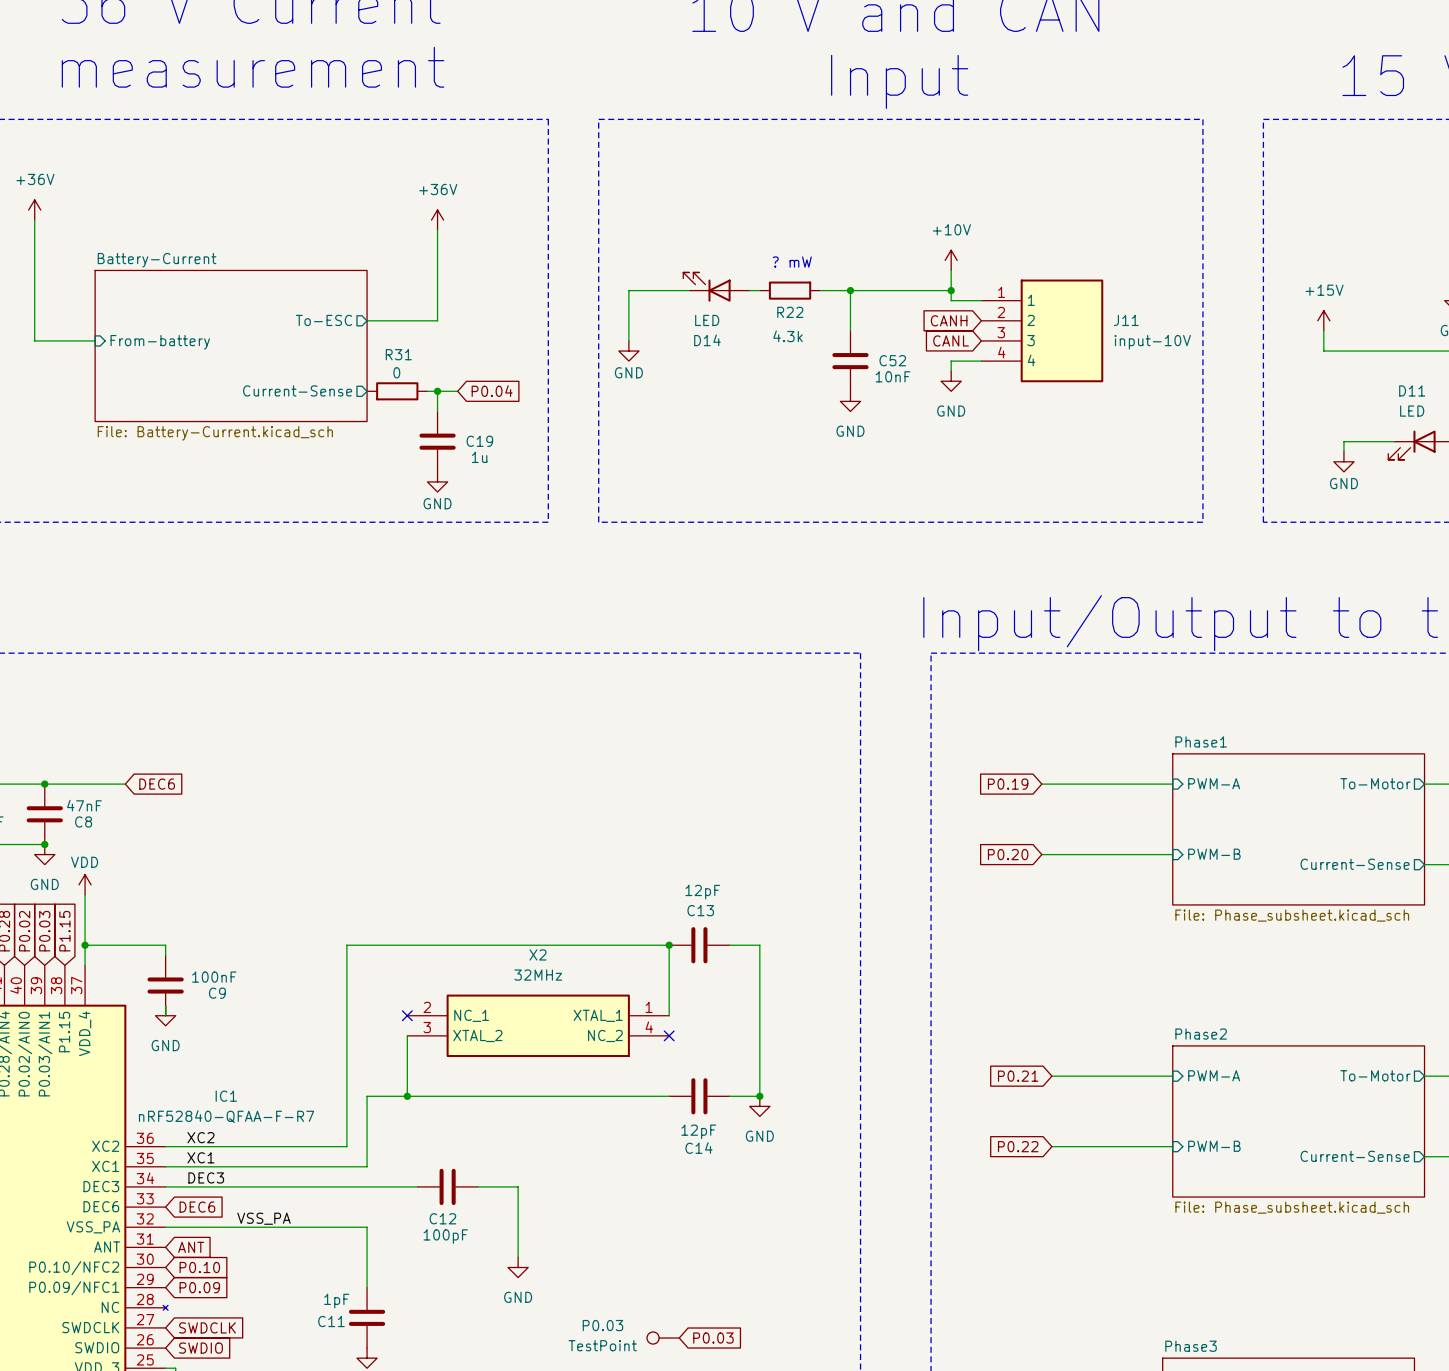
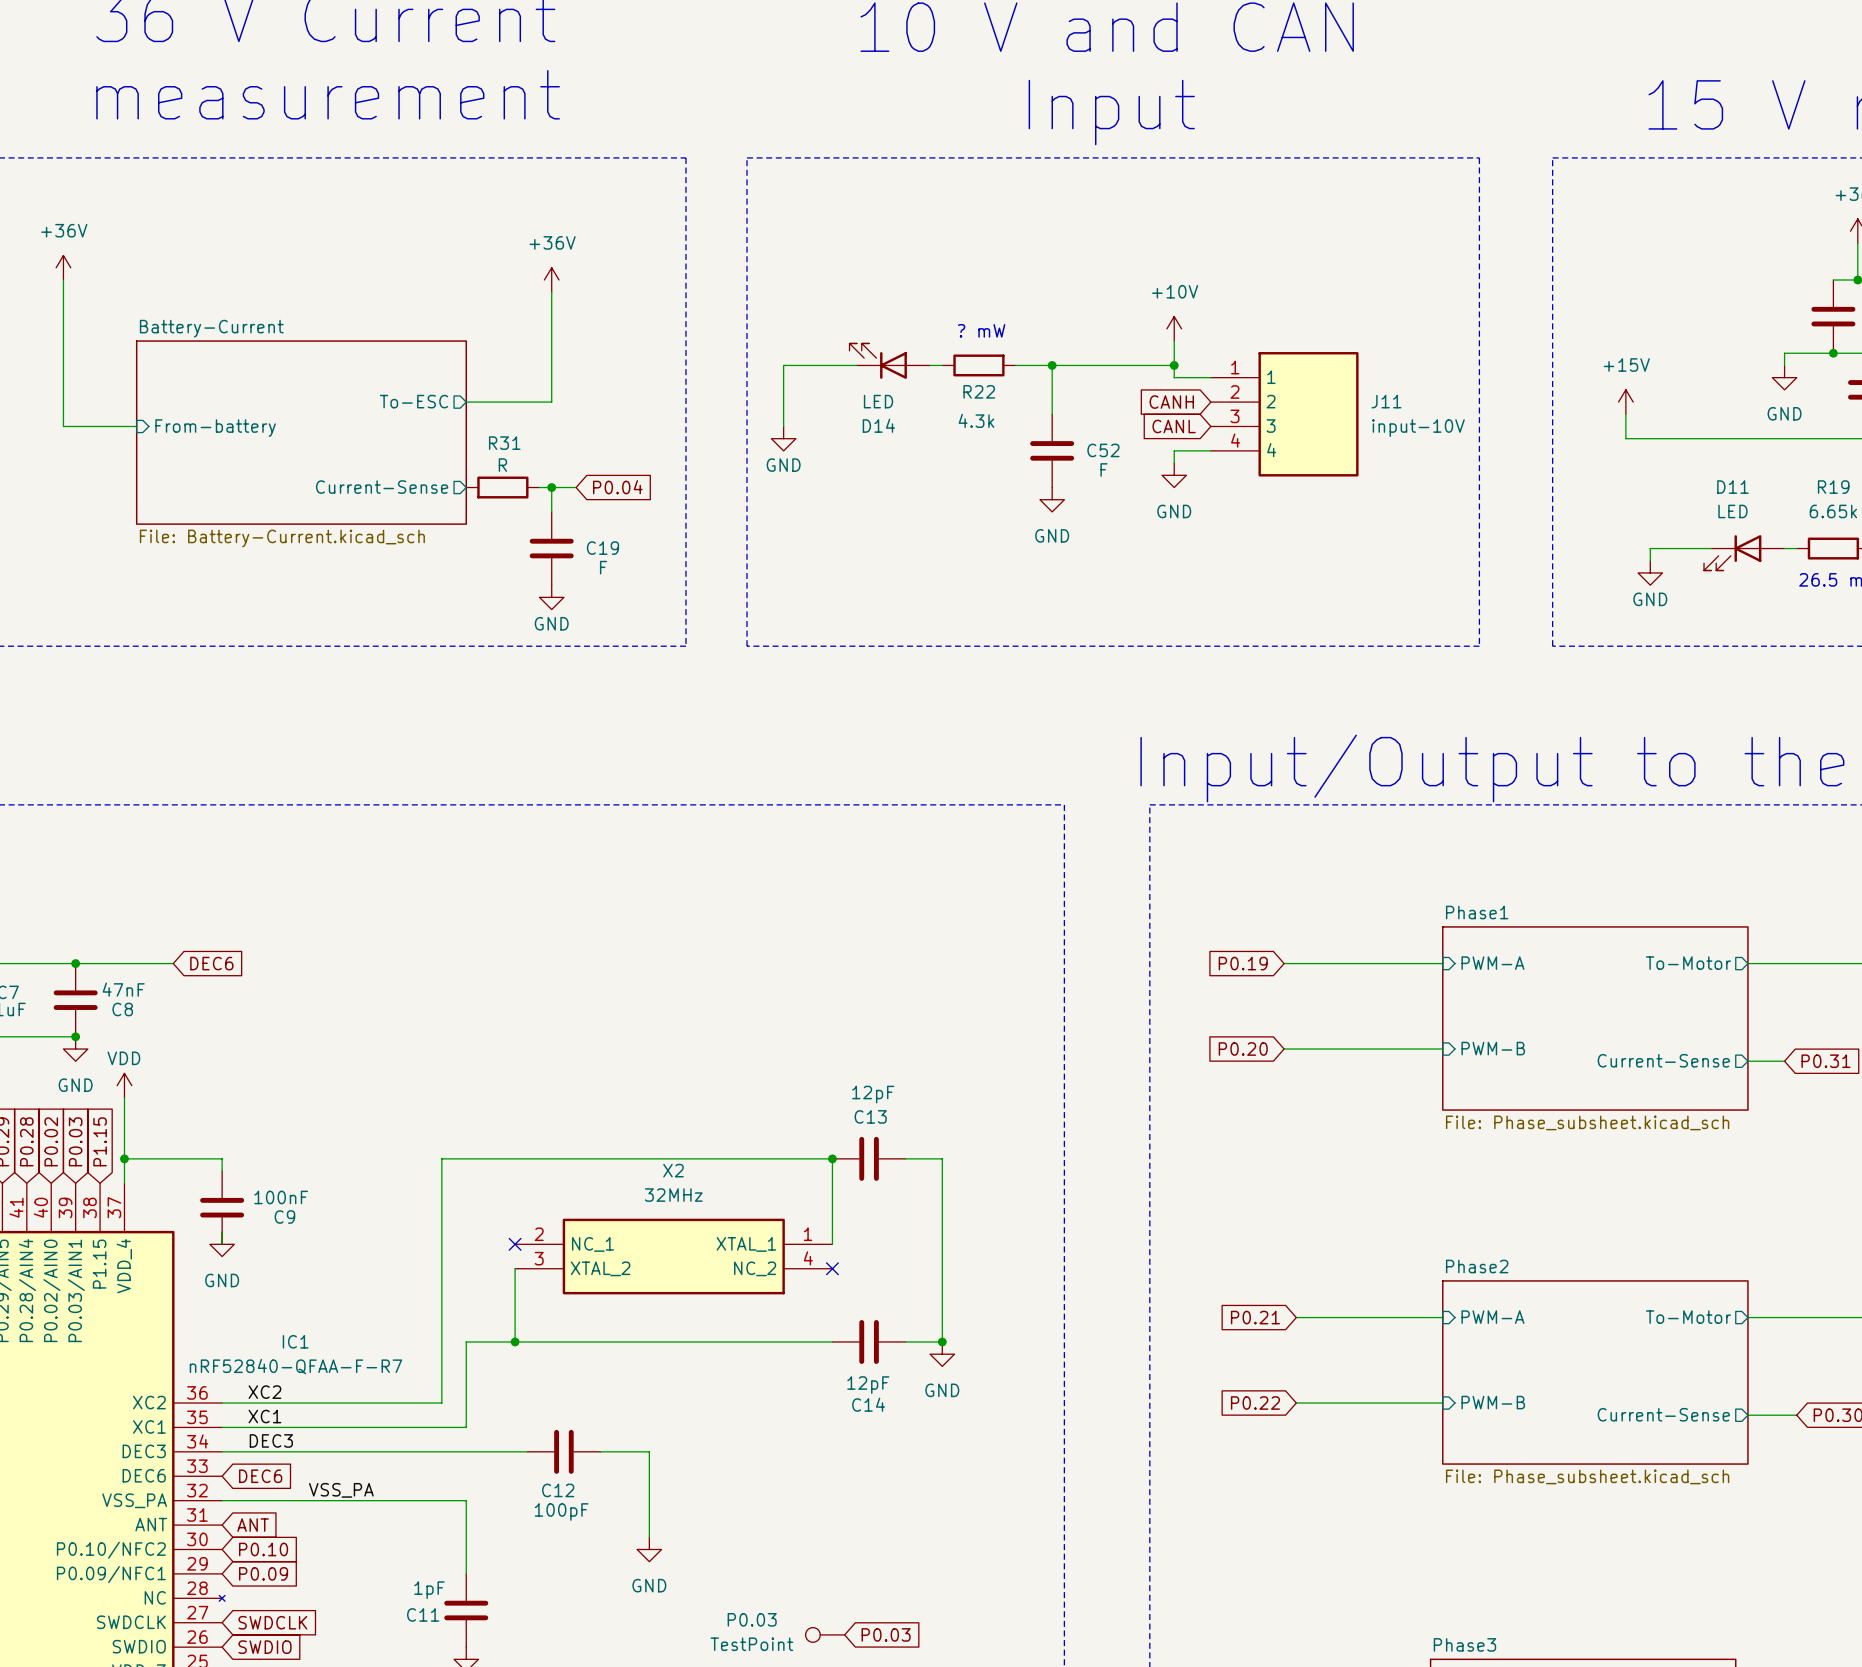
R31 value: 0 (396, 372) -> R (502, 465)
C52 value: 10nF (893, 376) -> F (1104, 469)
C19 value: 1u (479, 457) -> F (603, 567)

